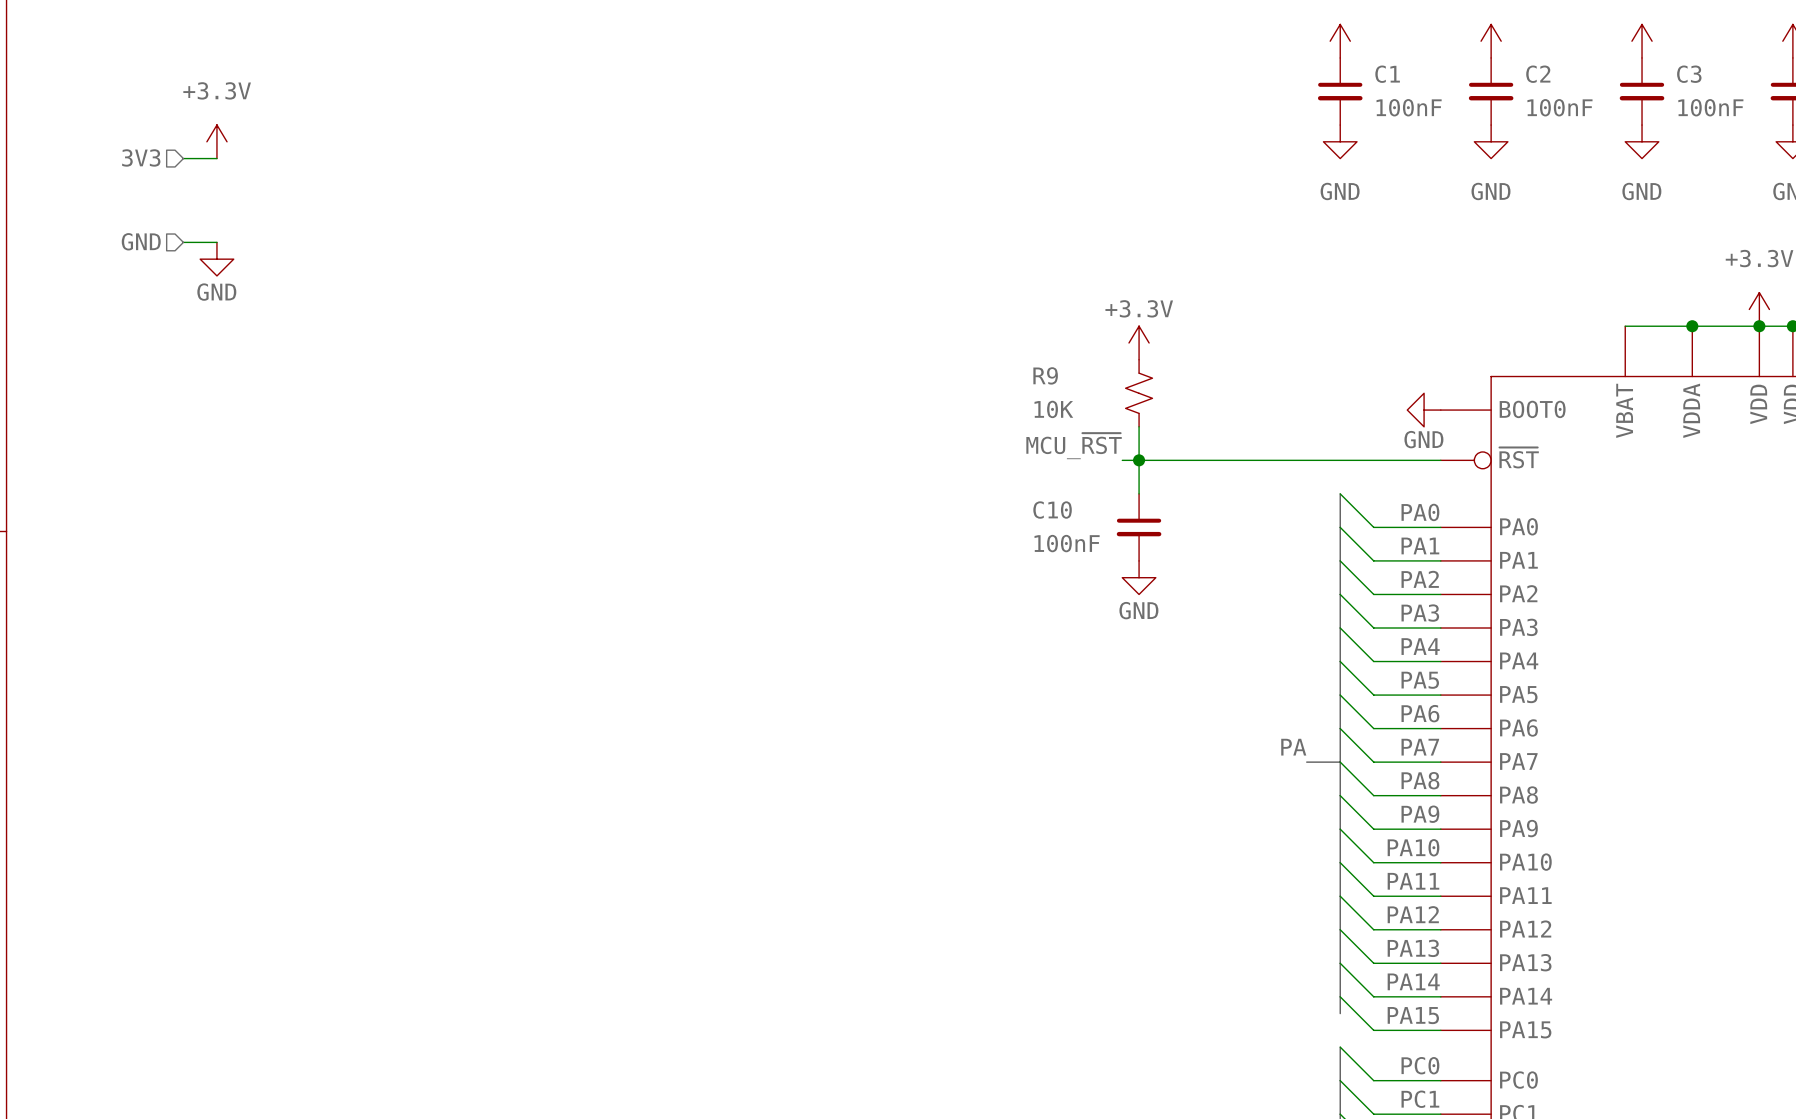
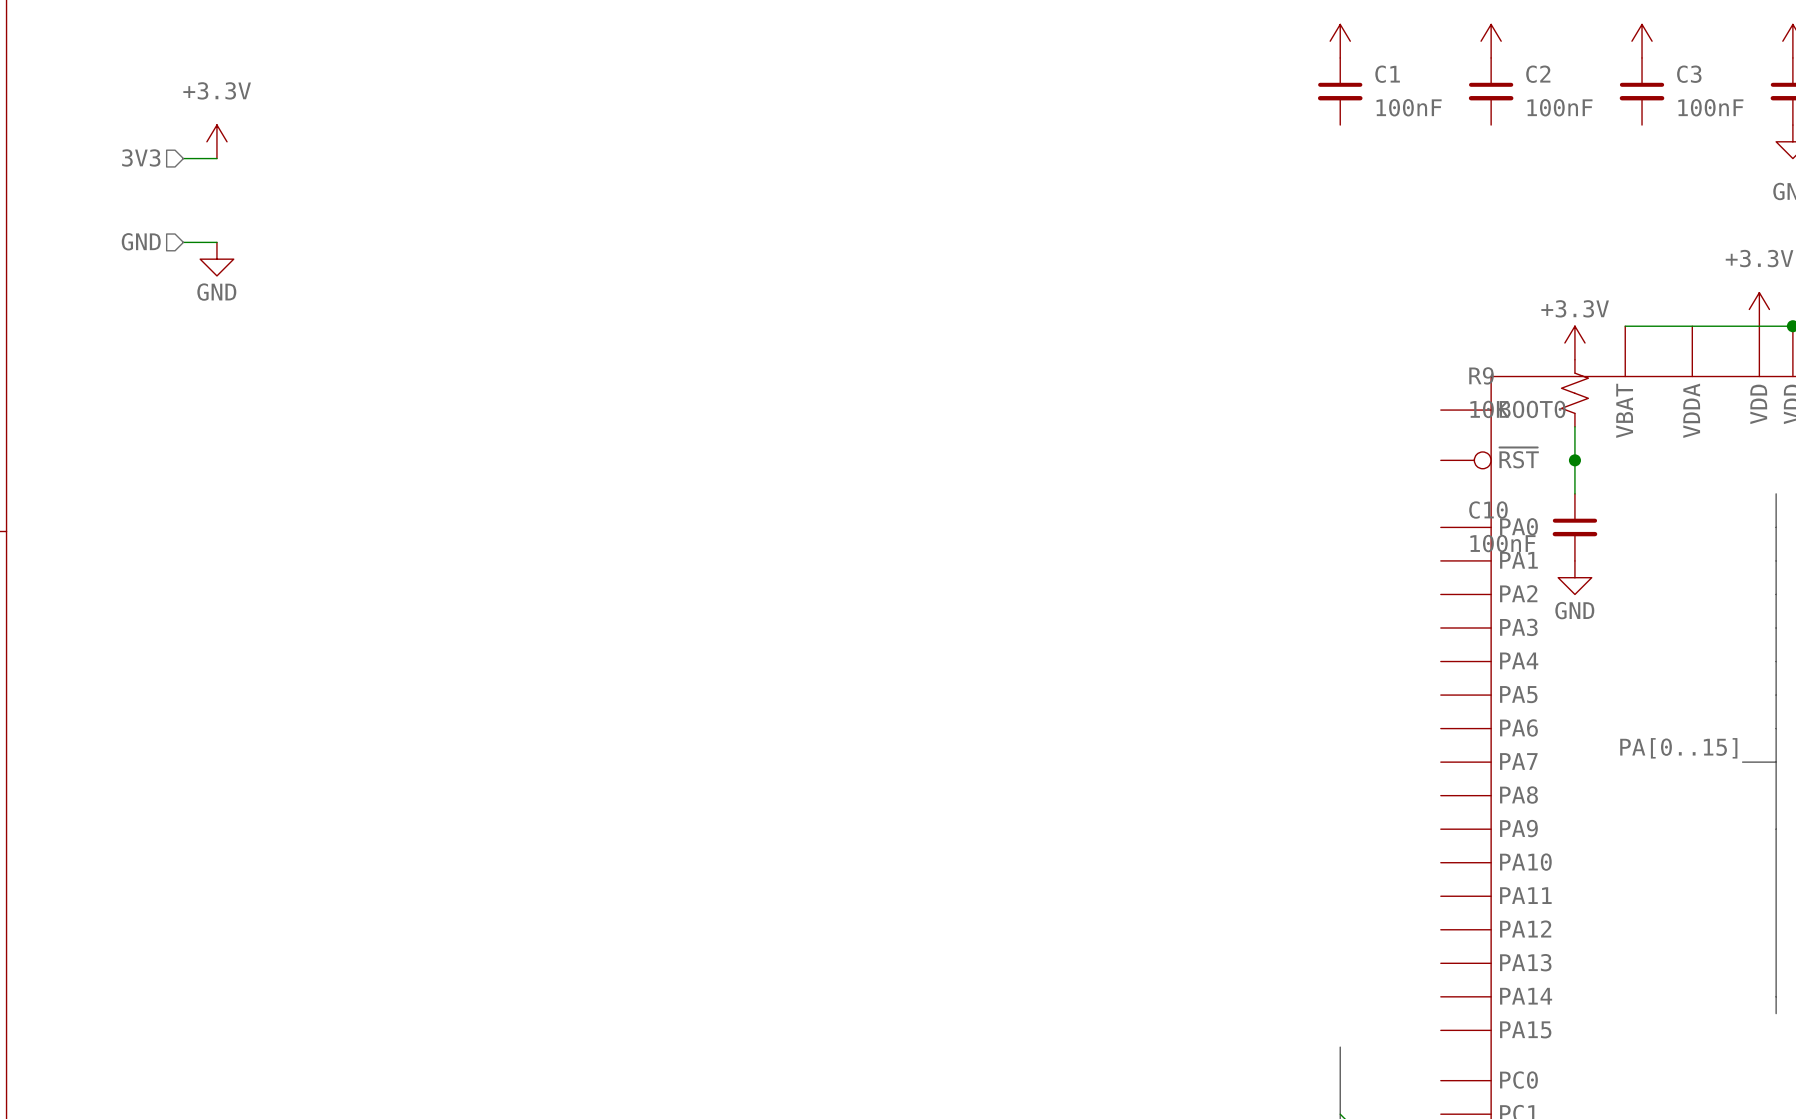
power symbol: GND (1340, 141) -> none
power symbol: GND (1491, 141) -> none
power symbol: GND (1642, 141) -> none
junction: (1692, 326) -> none
junction: (1759, 326) -> none
power symbol: +3.3V (1139, 342) -> none
power symbol: none -> +3.3V (1574, 342)
R9 position: (1139, 393) -> (1574, 393)
power symbol: GND (1424, 410) -> none
wire: (1139, 426) (1139, 493) -> none
wire: none -> (1574, 426) (1574, 493)
label: MCU_~{RST} (1074, 446) -> none
wire: (1122, 460) (1440, 460) -> none
junction: (1139, 460) -> none
junction: none -> (1574, 460)
wire: (1340, 493) (1373, 527) (1440, 527) -> none
bus: (1340, 493) (1340, 1013) -> none
bus: none -> (1776, 493) (1776, 1013)
label: PA0 (1420, 512) -> none
C10 position: (1139, 527) -> (1574, 527)
wire: (1340, 527) (1373, 560) (1440, 560) -> none
label: PA1 (1420, 545) -> none
wire: (1340, 560) (1373, 594) (1440, 594) -> none
power symbol: GND (1139, 577) -> none
power symbol: none -> GND (1574, 577)
label: PA2 (1420, 579) -> none
wire: (1340, 594) (1373, 628) (1440, 628) -> none
label: PA3 (1420, 613) -> none
wire: (1340, 628) (1373, 661) (1440, 661) -> none
label: PA4 (1420, 646) -> none
wire: (1340, 661) (1373, 695) (1440, 695) -> none
label: PA5 (1420, 680) -> none
wire: (1340, 695) (1373, 728) (1440, 728) -> none
label: PA6 (1420, 713) -> none
wire: (1340, 728) (1373, 762) (1440, 762) -> none
label: PA (1293, 747) -> none
label: PA7 (1420, 747) -> none
label: none -> PA[0..15] (1678, 748)
bus: (1306, 762) (1340, 762) -> none
wire: (1340, 762) (1373, 795) (1440, 795) -> none
bus: none -> (1742, 762) (1776, 762)
label: PA8 (1420, 780) -> none
wire: (1340, 795) (1373, 829) (1440, 829) -> none
label: PA9 (1420, 814) -> none
wire: (1340, 829) (1373, 862) (1440, 862) -> none
label: PA10 (1413, 847) -> none
wire: (1340, 862) (1373, 896) (1440, 896) -> none
label: PA11 (1413, 881) -> none
wire: (1340, 896) (1373, 929) (1440, 929) -> none
label: PA12 (1413, 914) -> none
wire: (1340, 929) (1373, 963) (1440, 963) -> none
label: PA13 (1413, 948) -> none
wire: (1340, 963) (1373, 996) (1440, 996) -> none
label: PA14 (1413, 981) -> none
wire: (1340, 996) (1373, 1030) (1440, 1030) -> none
label: PA15 (1413, 1015) -> none
wire: (1340, 1047) (1373, 1080) (1440, 1080) -> none
label: PC0 (1420, 1065) -> none
wire: (1340, 1080) (1373, 1114) (1440, 1114) -> none
label: PC1 (1420, 1099) -> none

